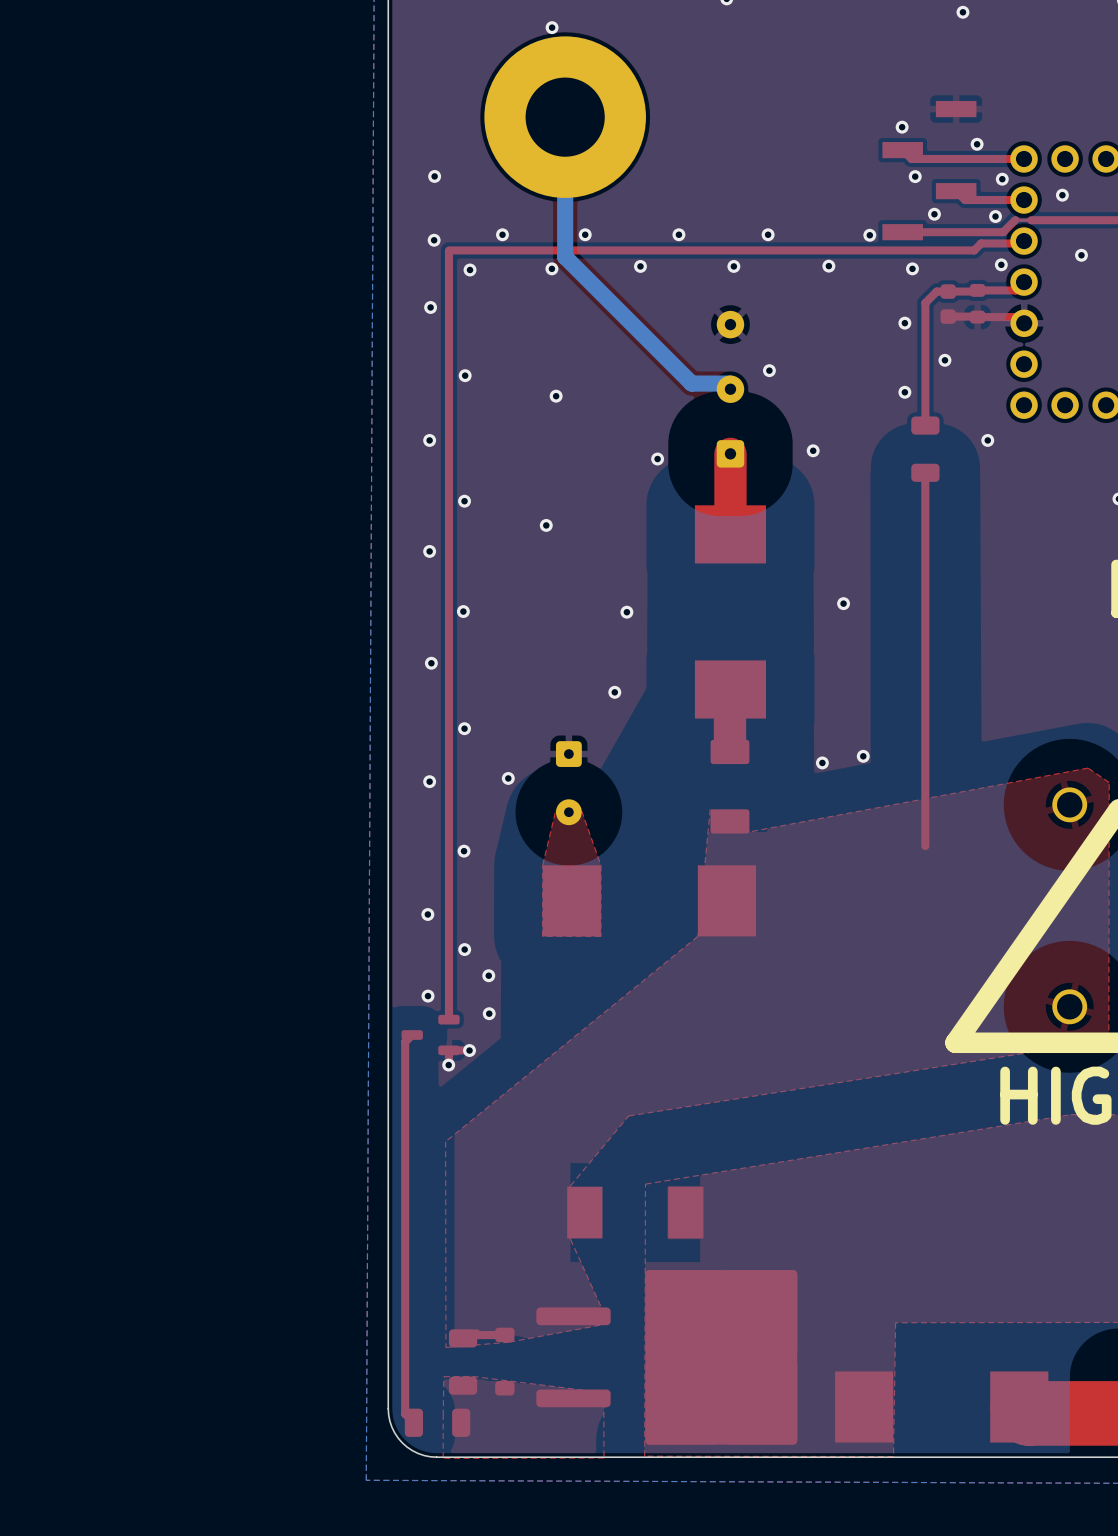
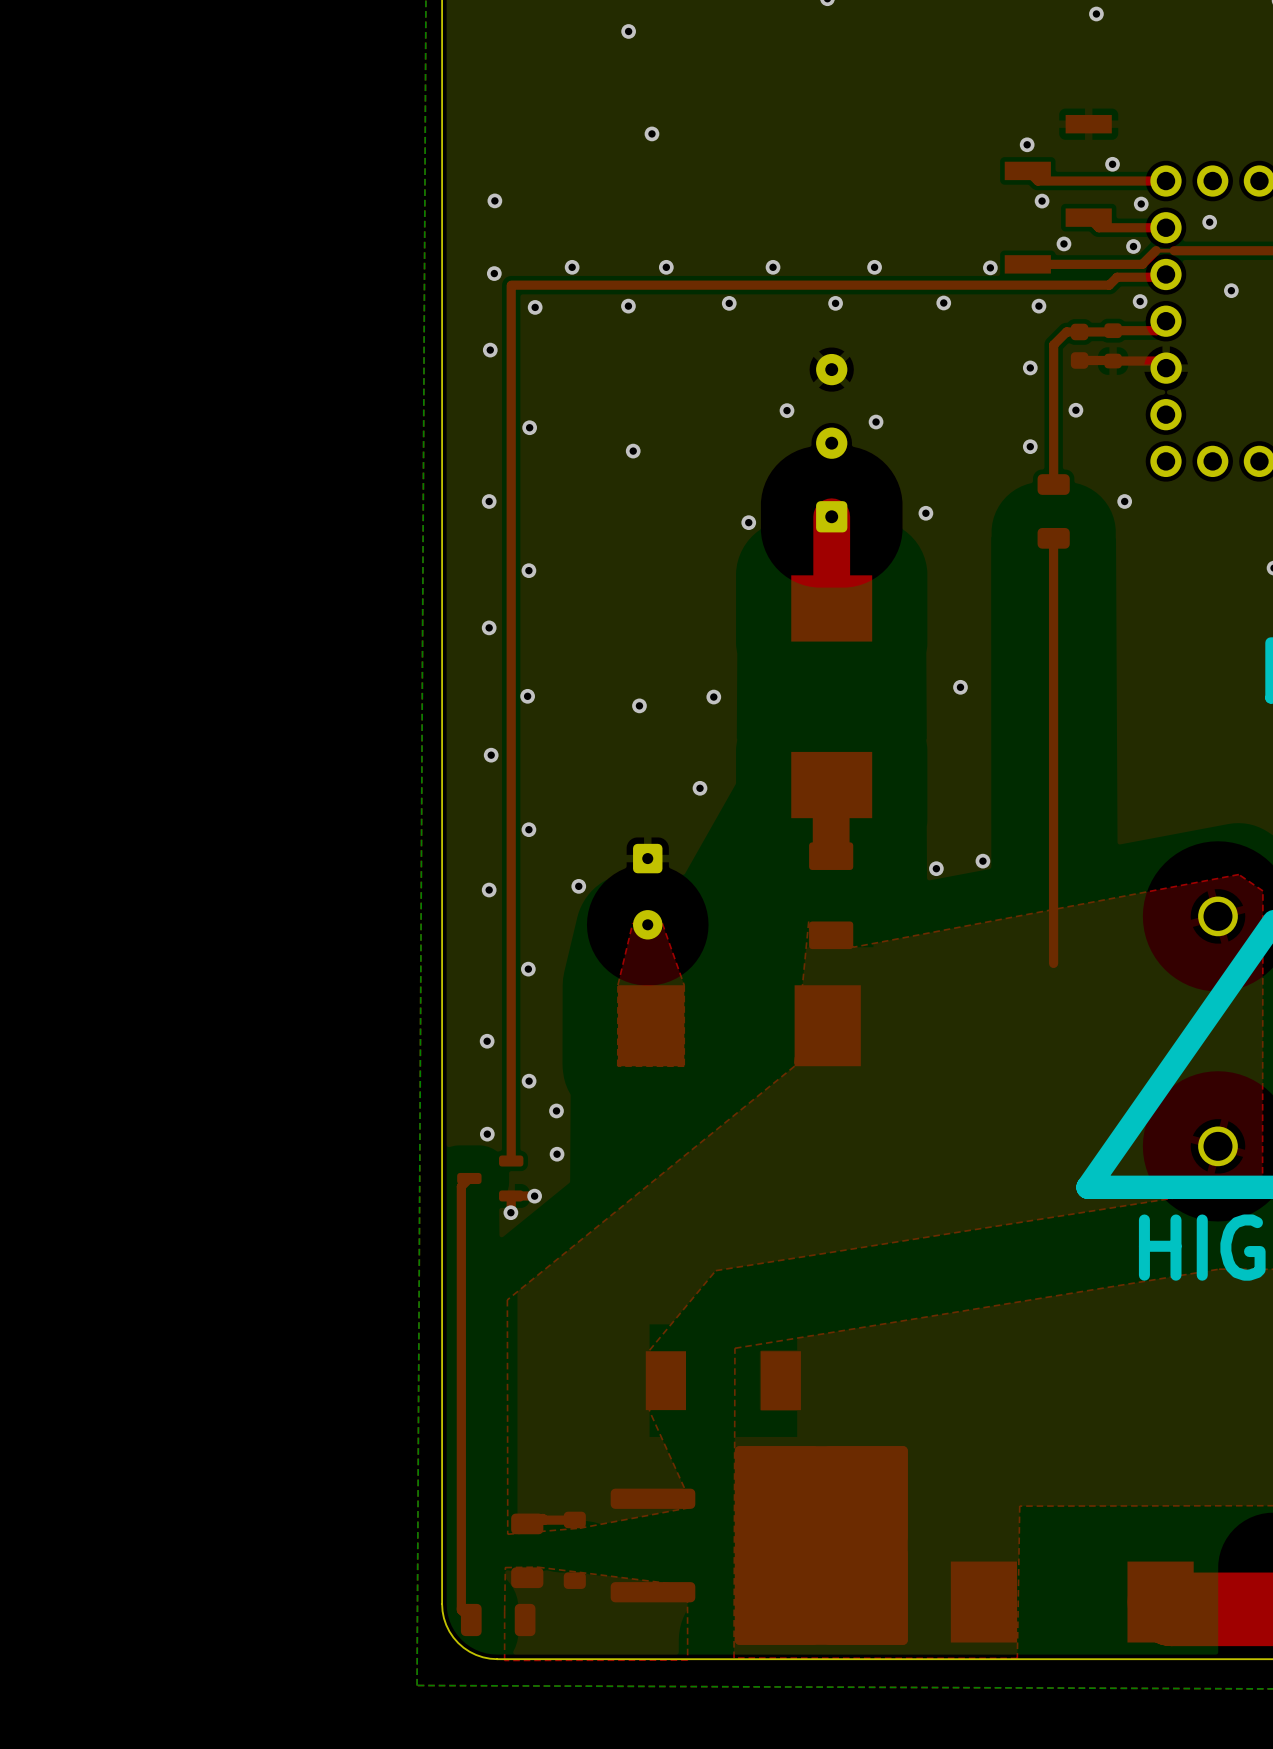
bottom track: (565, 117) (565, 256) (691, 383) (730, 383) -> none
part: (565, 117) -> none
via: none -> (651, 133)
via: none -> (787, 410)
via position: (546, 525) -> (639, 705)

